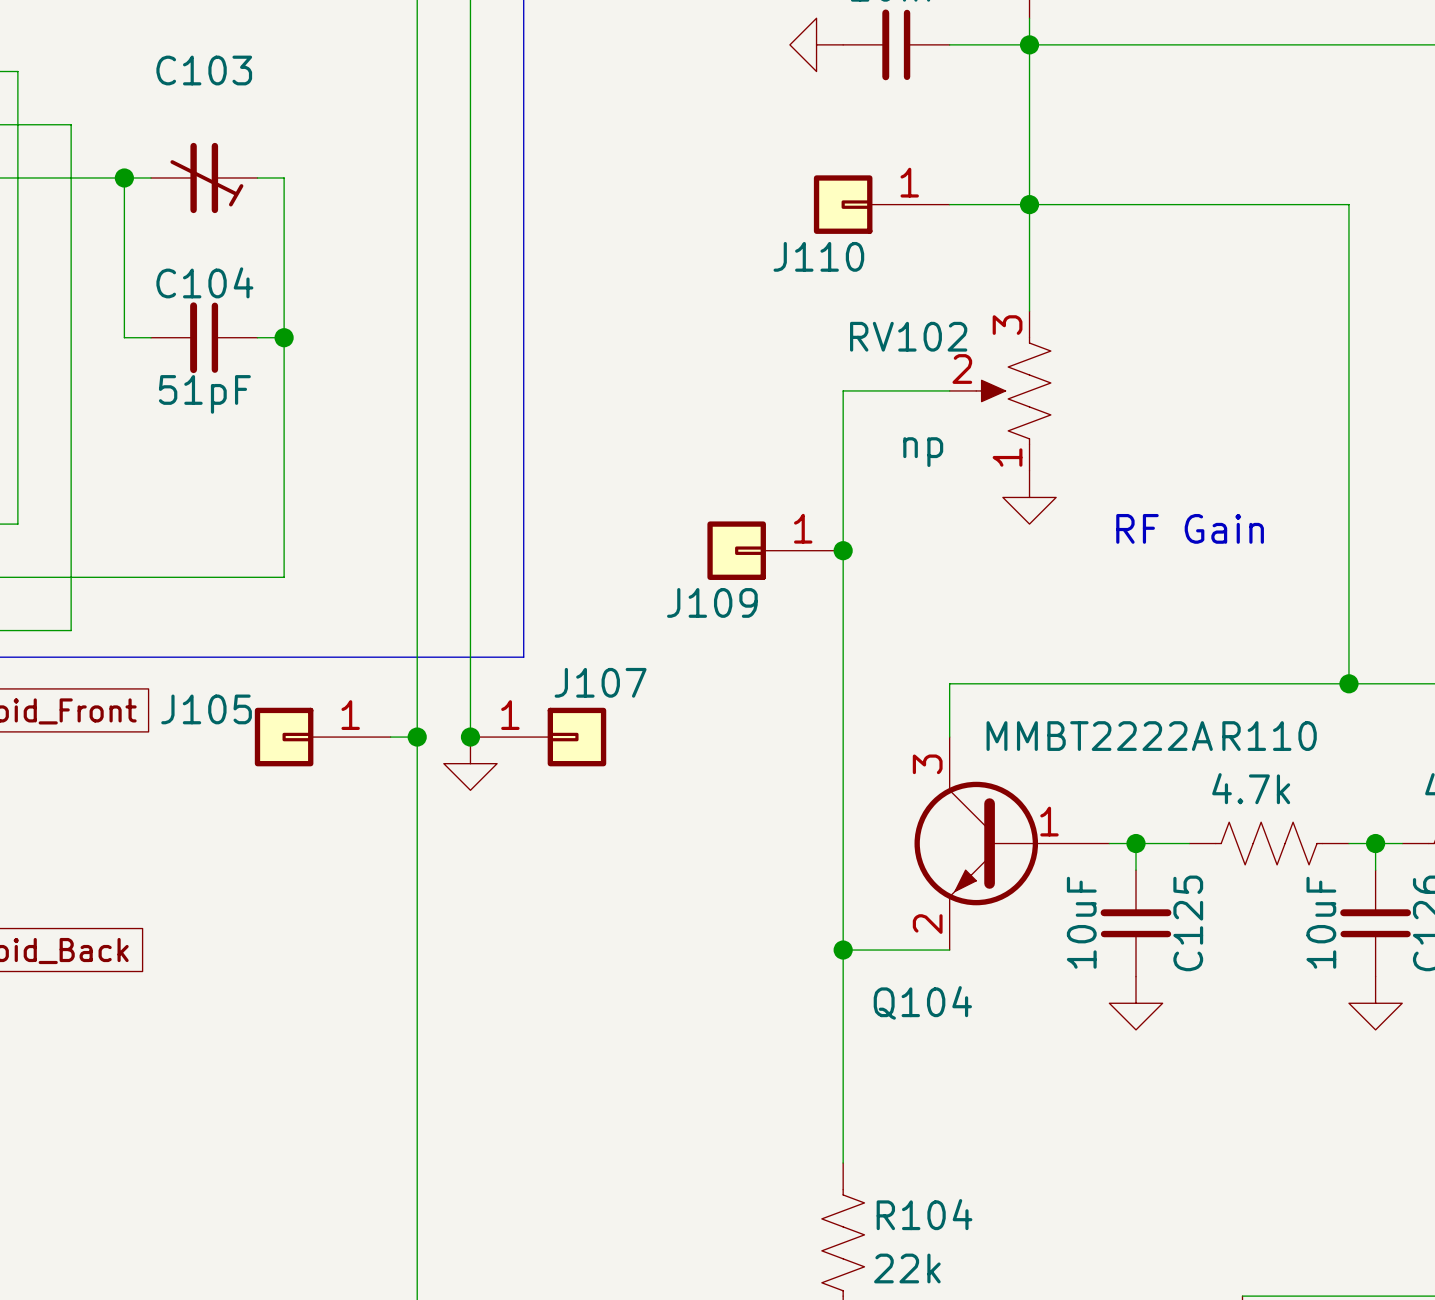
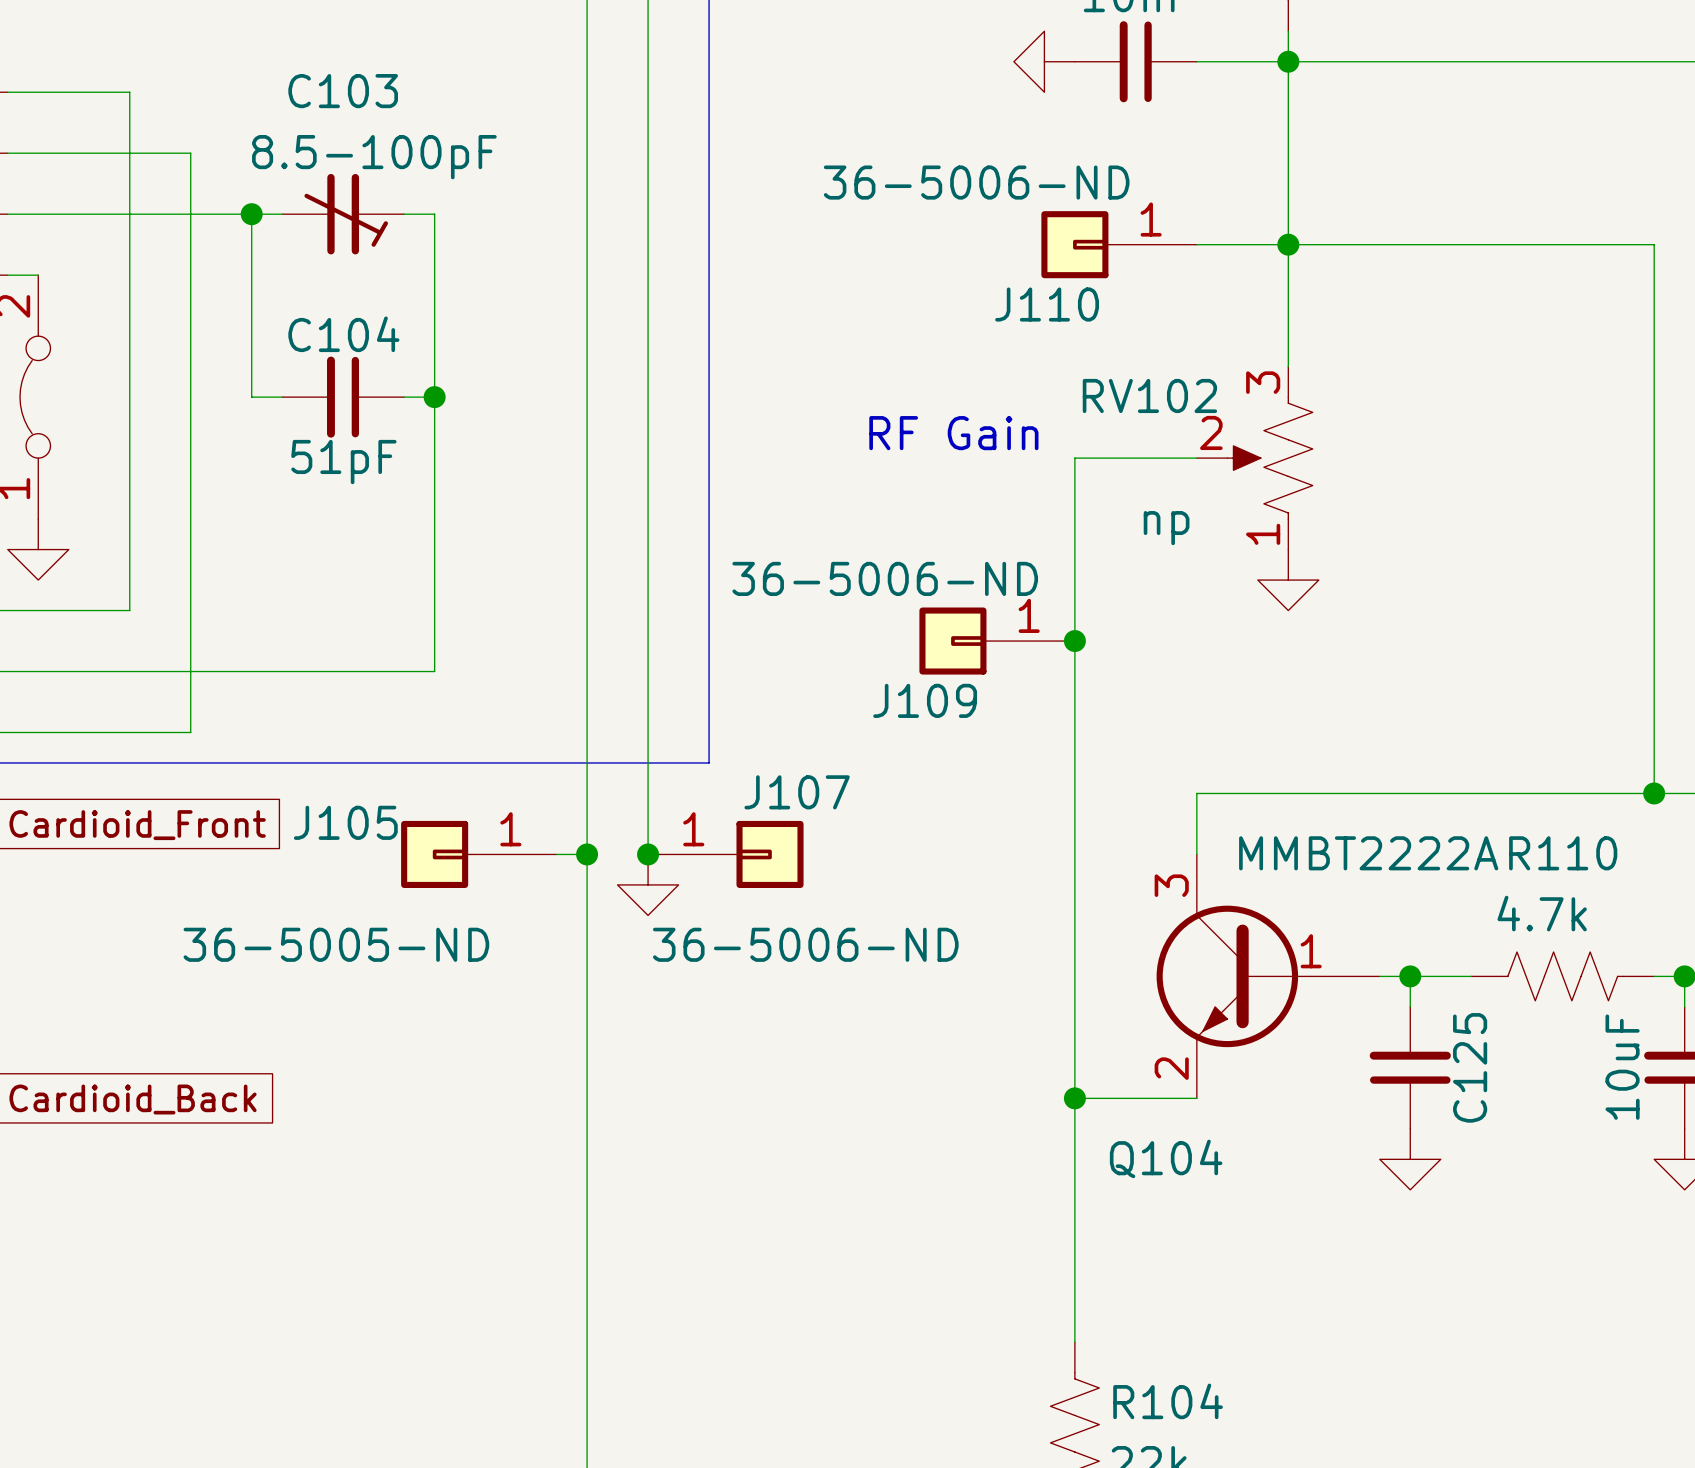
C103 value: none -> 8.5-100pF (374, 157)
J110 value: none -> 36-5006-ND (976, 182)
J109 value: none -> 36-5006-ND (885, 578)
text position: RF Gain (1190, 528) -> RF Gain (953, 433)
J105 value: none -> 36-5005-ND (336, 944)
J107 value: none -> 36-5006-ND (805, 944)
C125 value: 10uF (1081, 922) -> none

